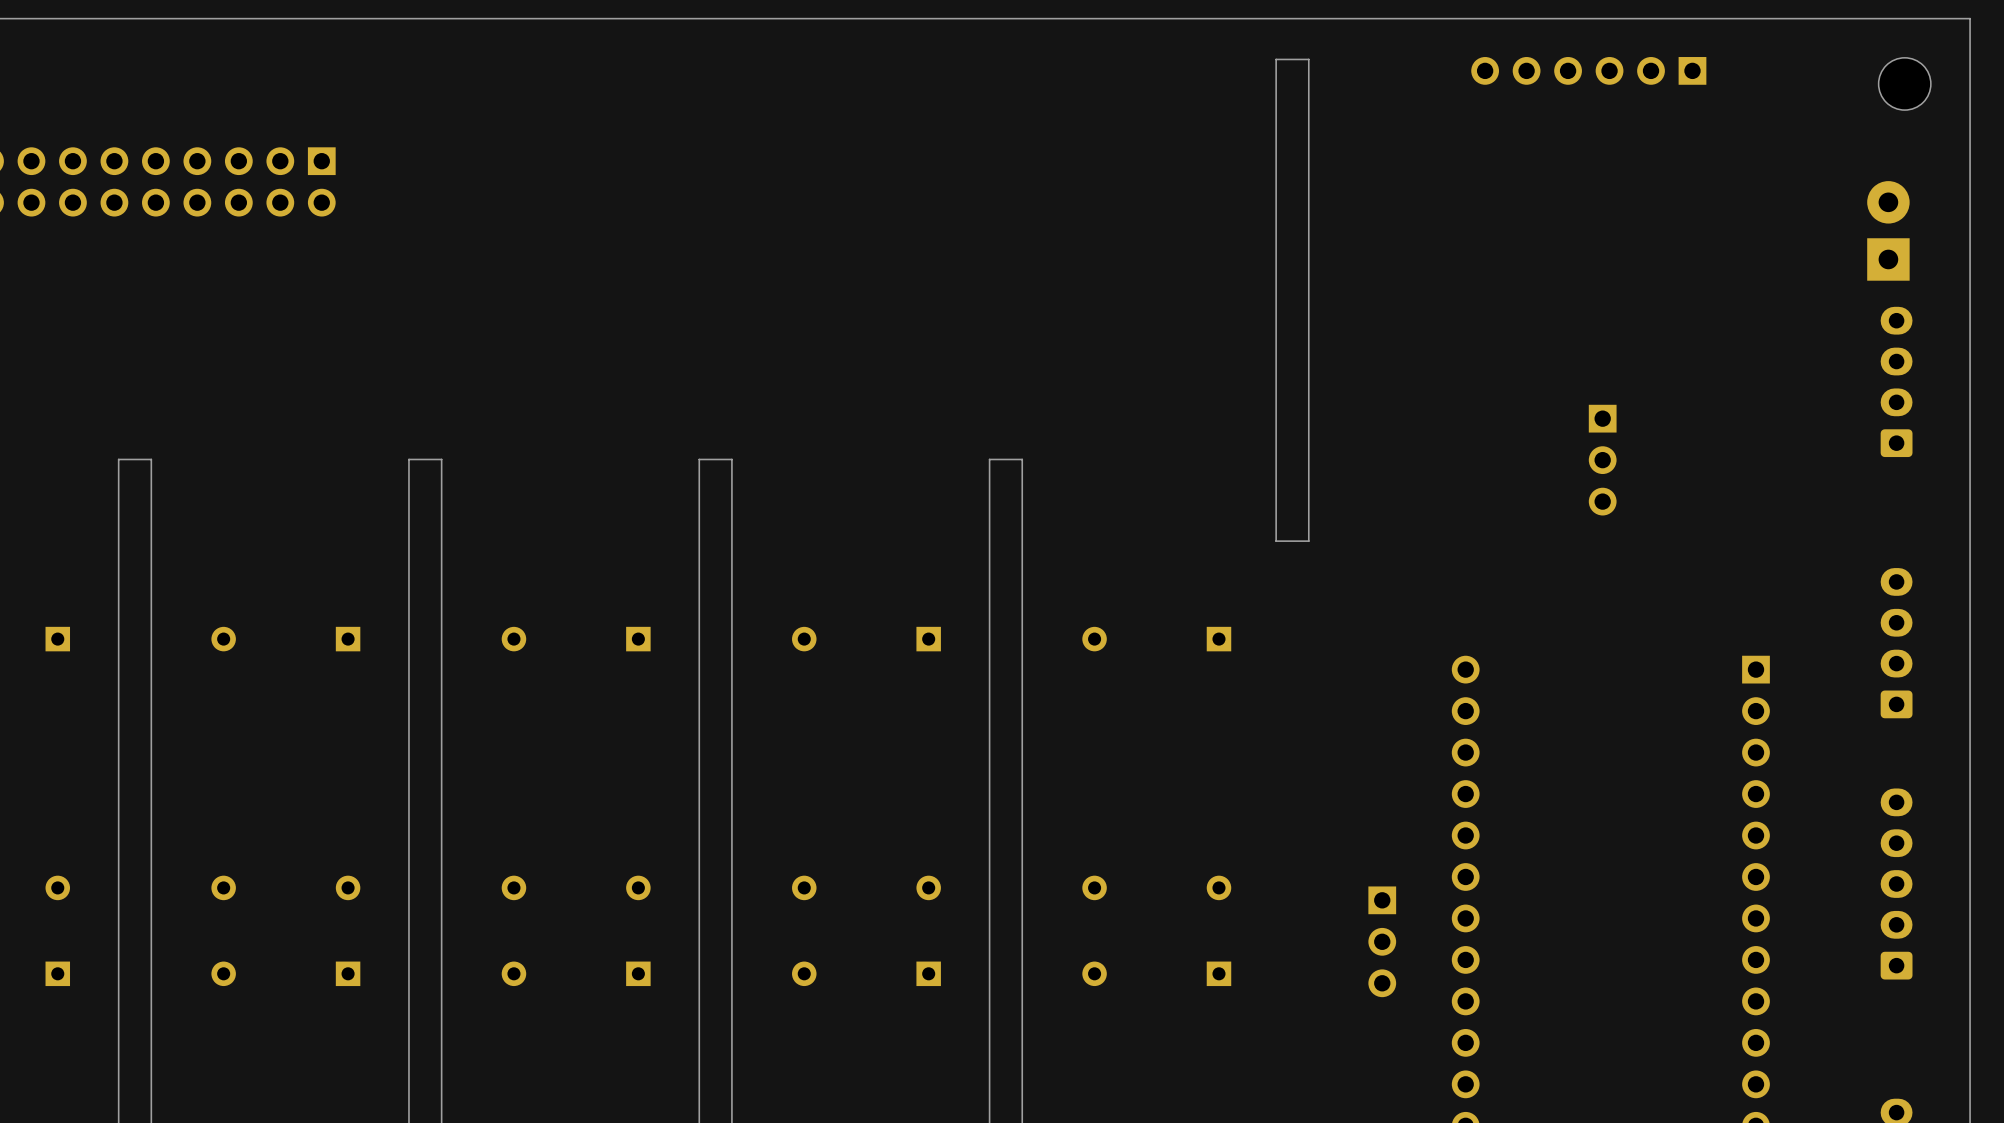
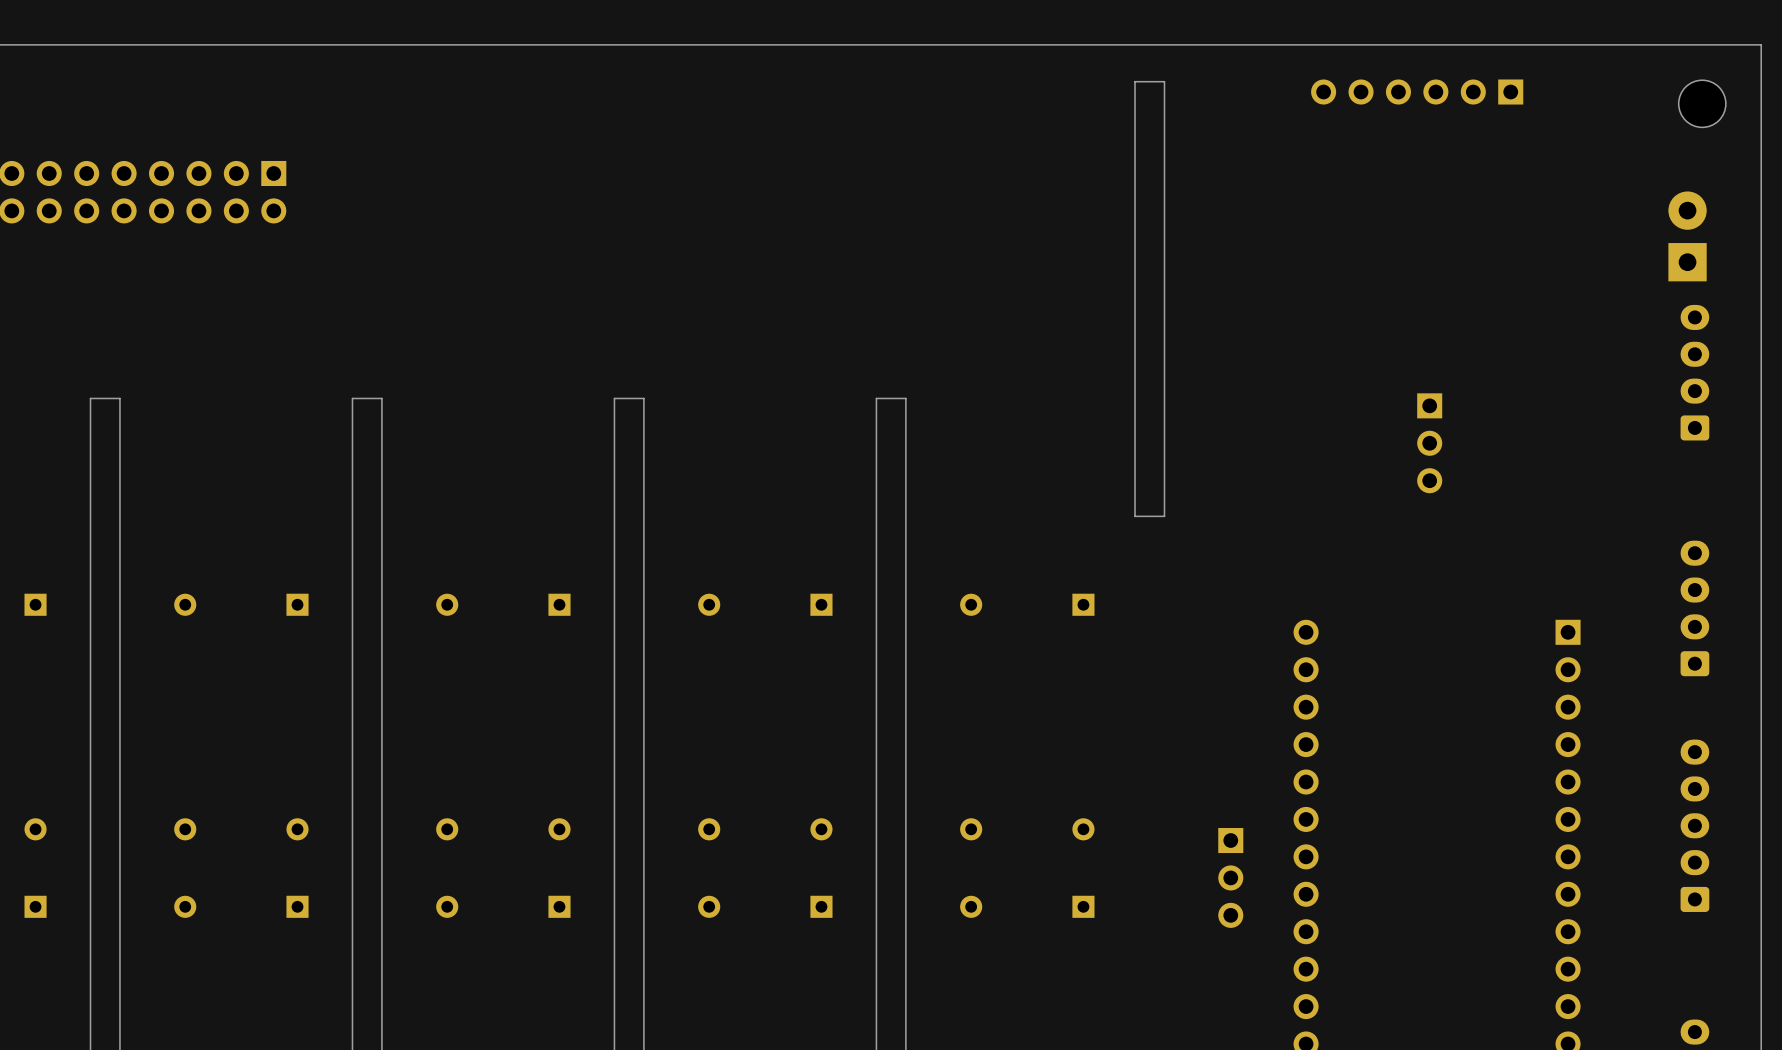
board edge: (151, 459) (118, 459) -> (119, 442) (119, 398) (90, 398) (90, 442)
board edge: (441, 459) (408, 459) -> (381, 442) (381, 398) (352, 398) (352, 442)
board edge: (731, 459) (699, 459) -> (643, 442) (643, 398) (614, 398) (614, 442)
board edge: (1022, 459) (989, 459) -> (905, 442) (905, 398) (876, 398) (876, 442)

